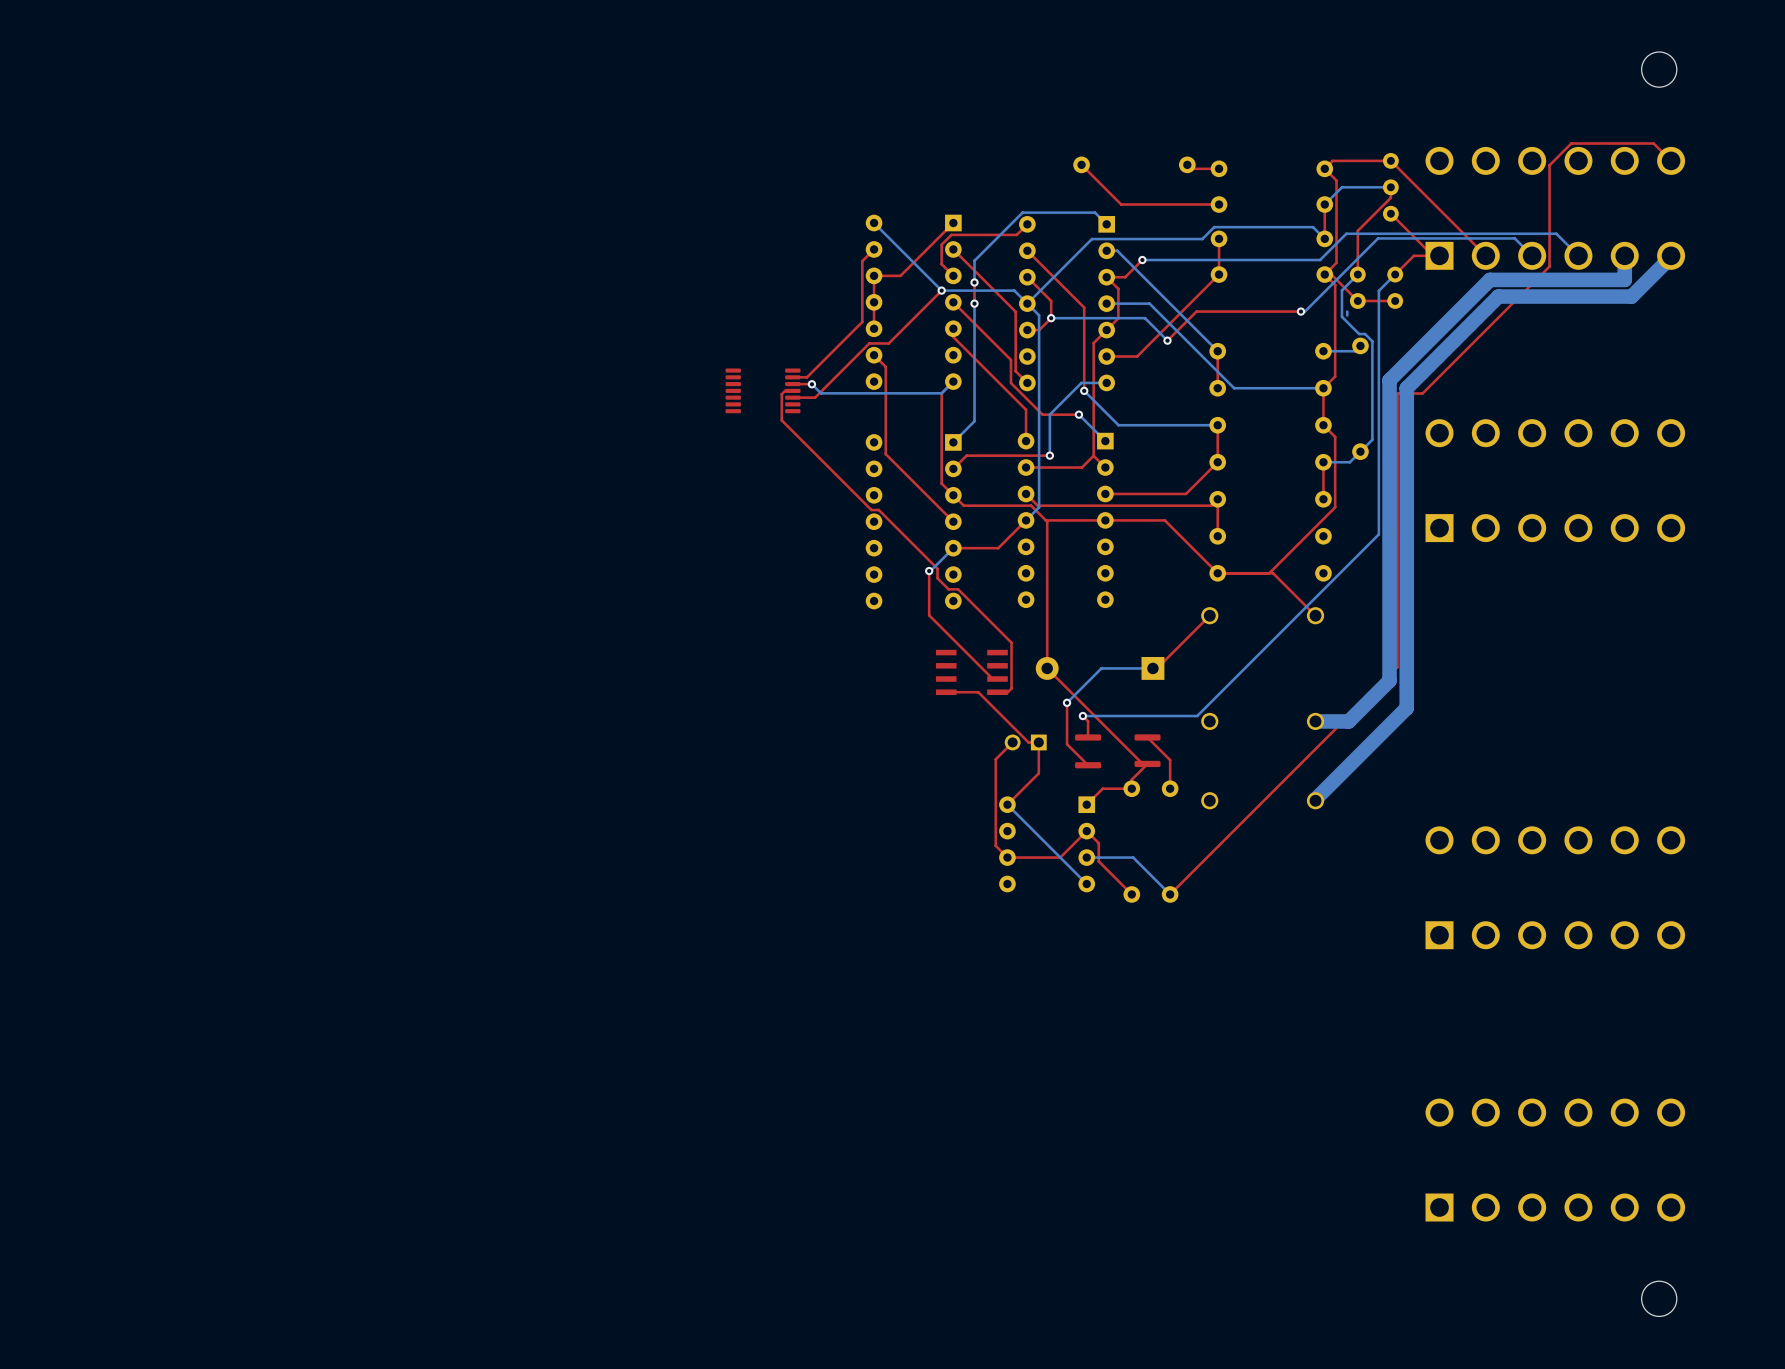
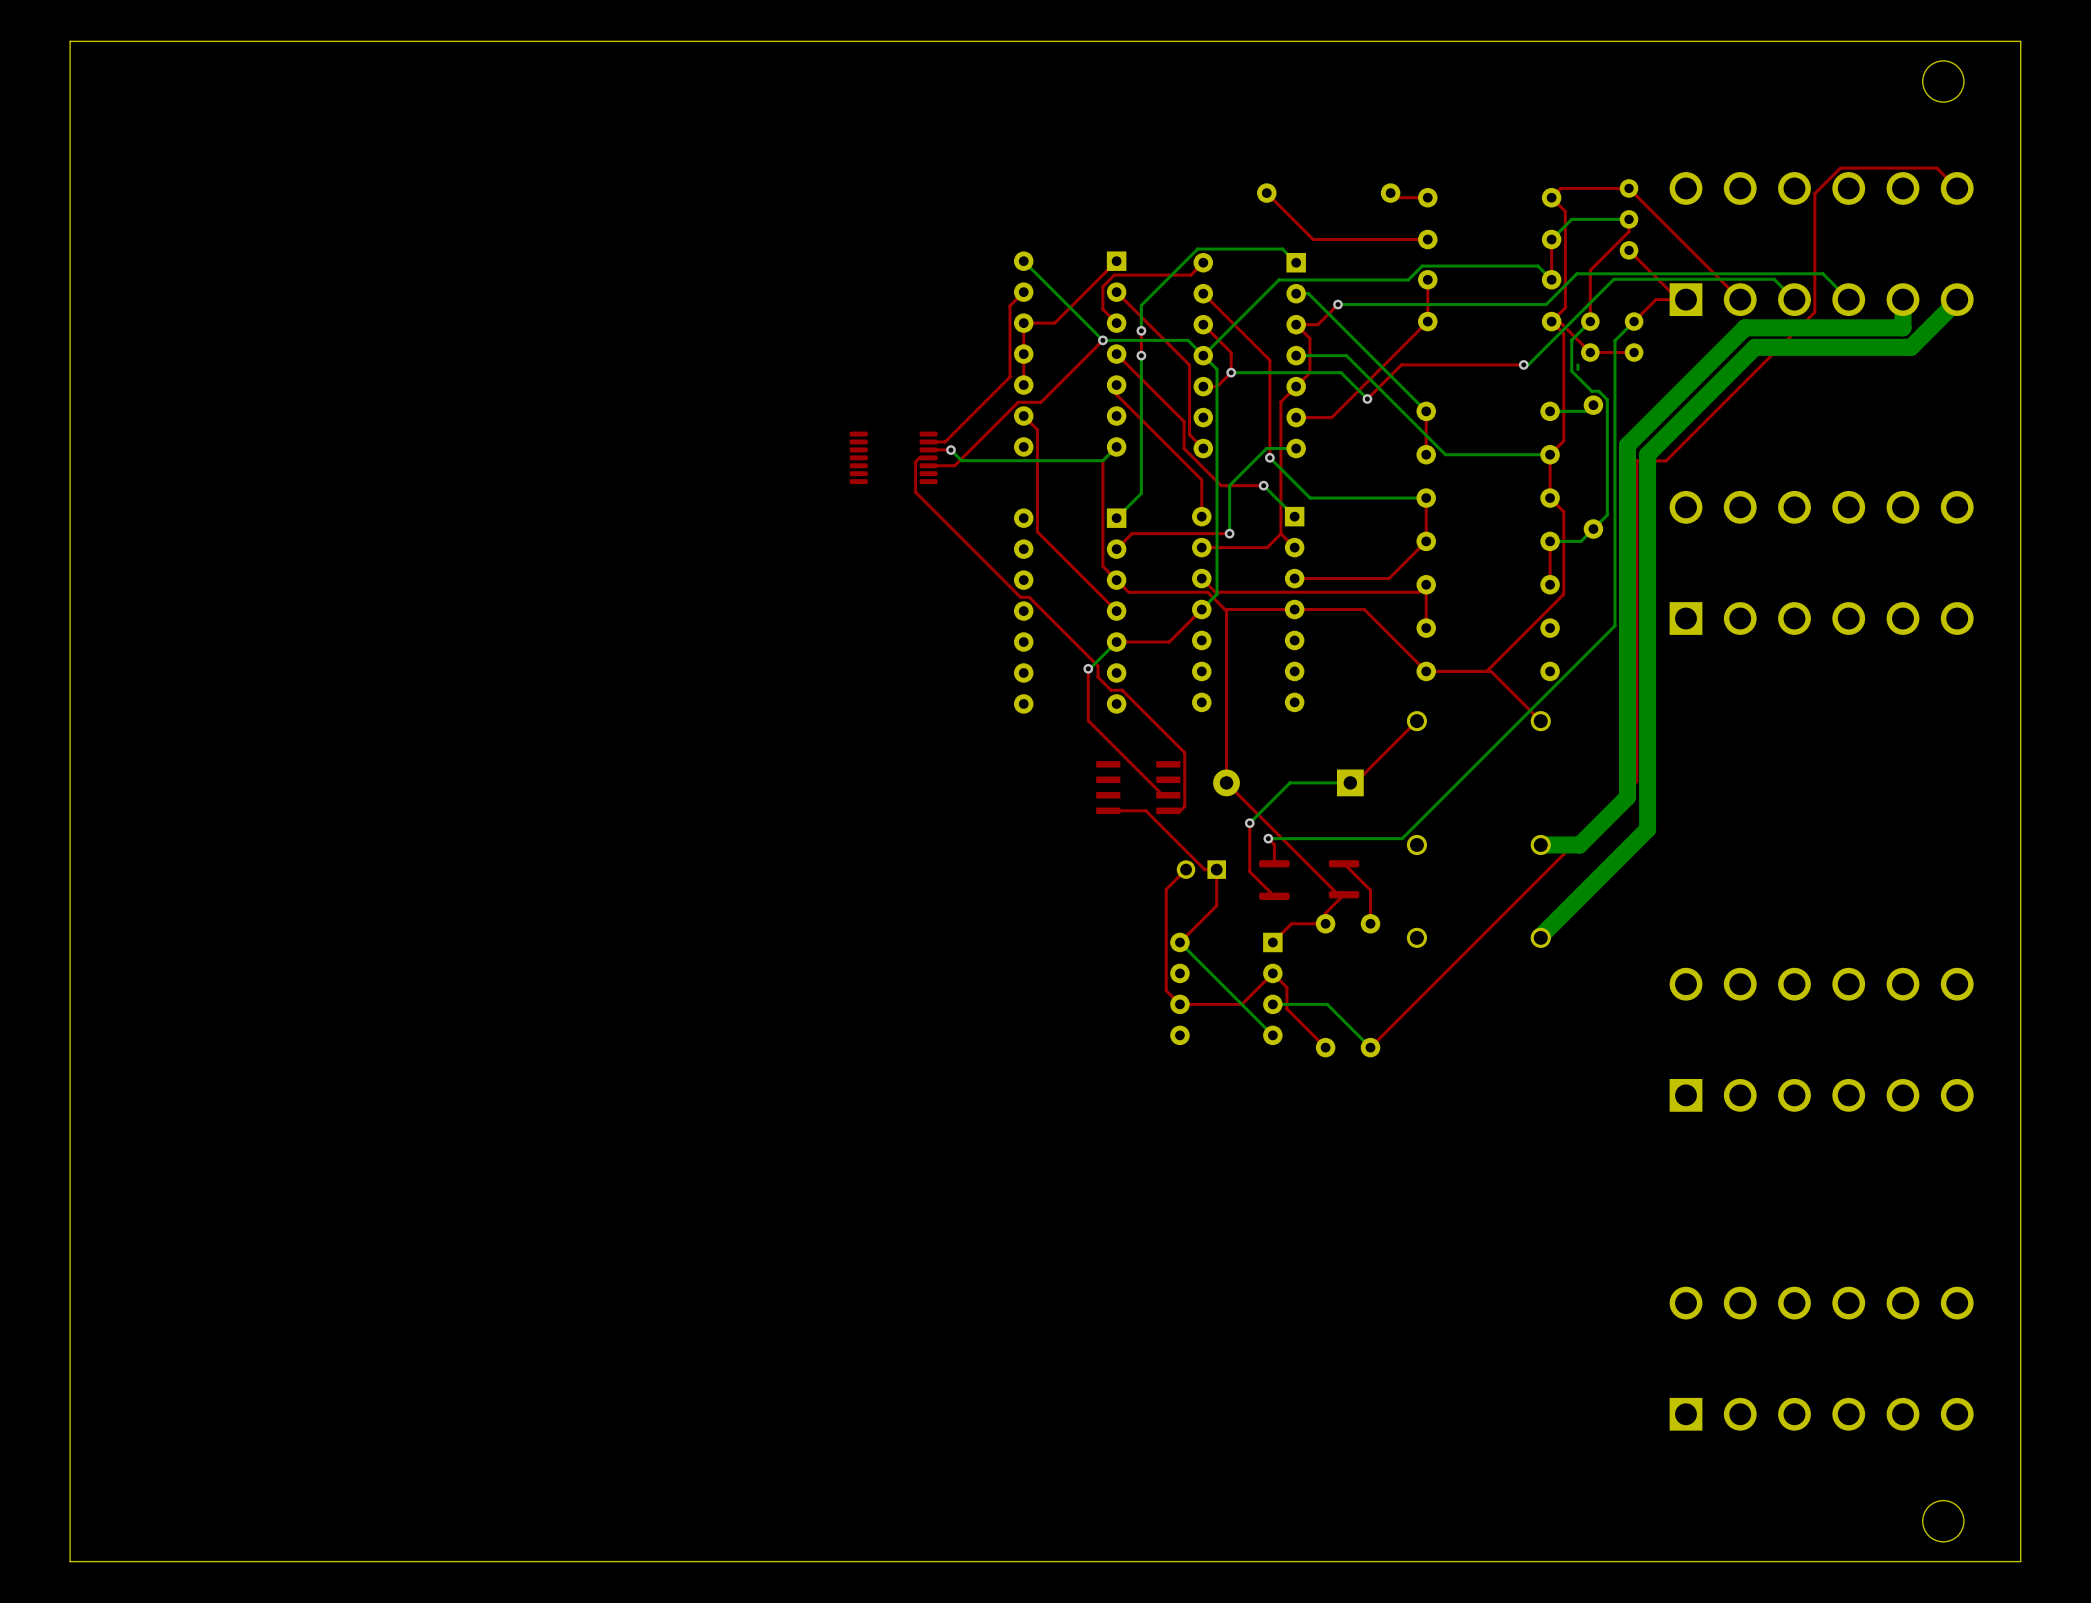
board edge: none -> (2020, 41) (70, 41) (70, 1561) (2020, 1561) (2020, 41)

